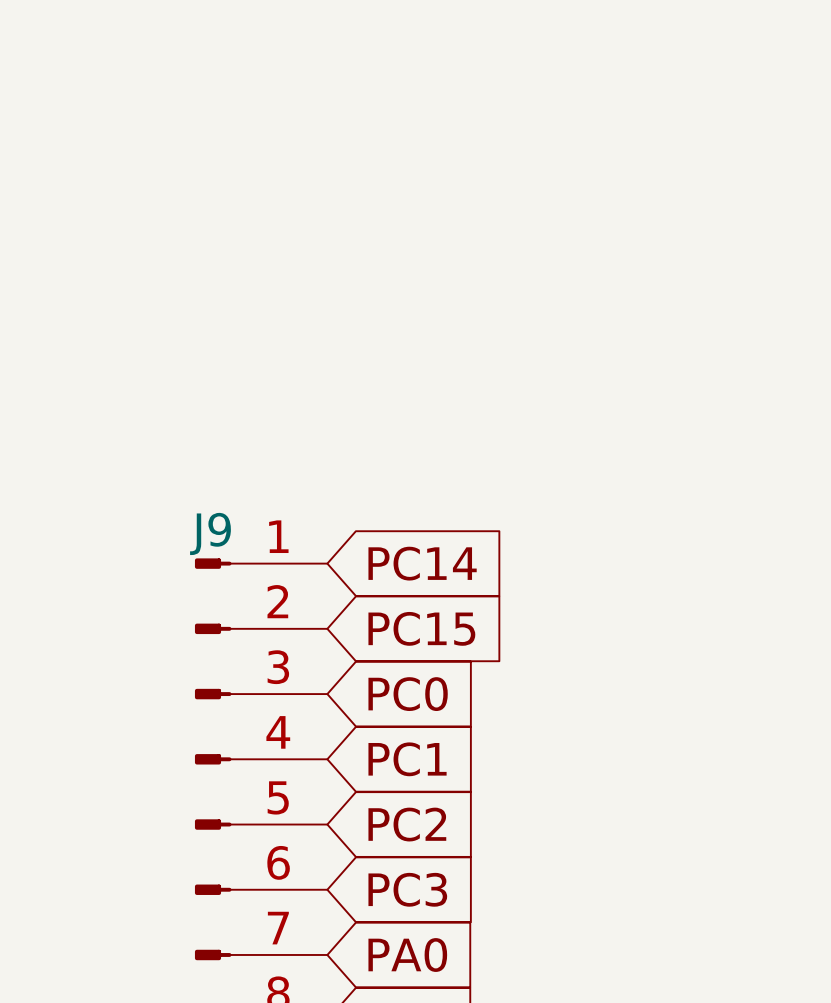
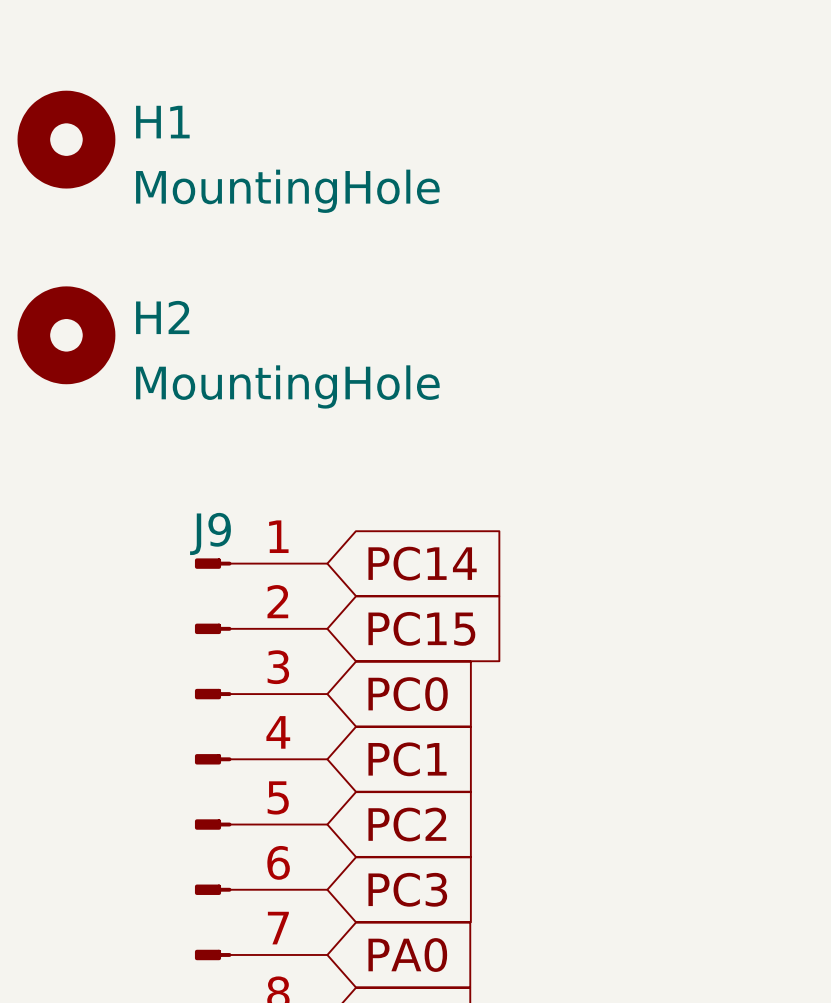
H1: none -> MountingHole (66, 139)
H2: none -> MountingHole (66, 335)

